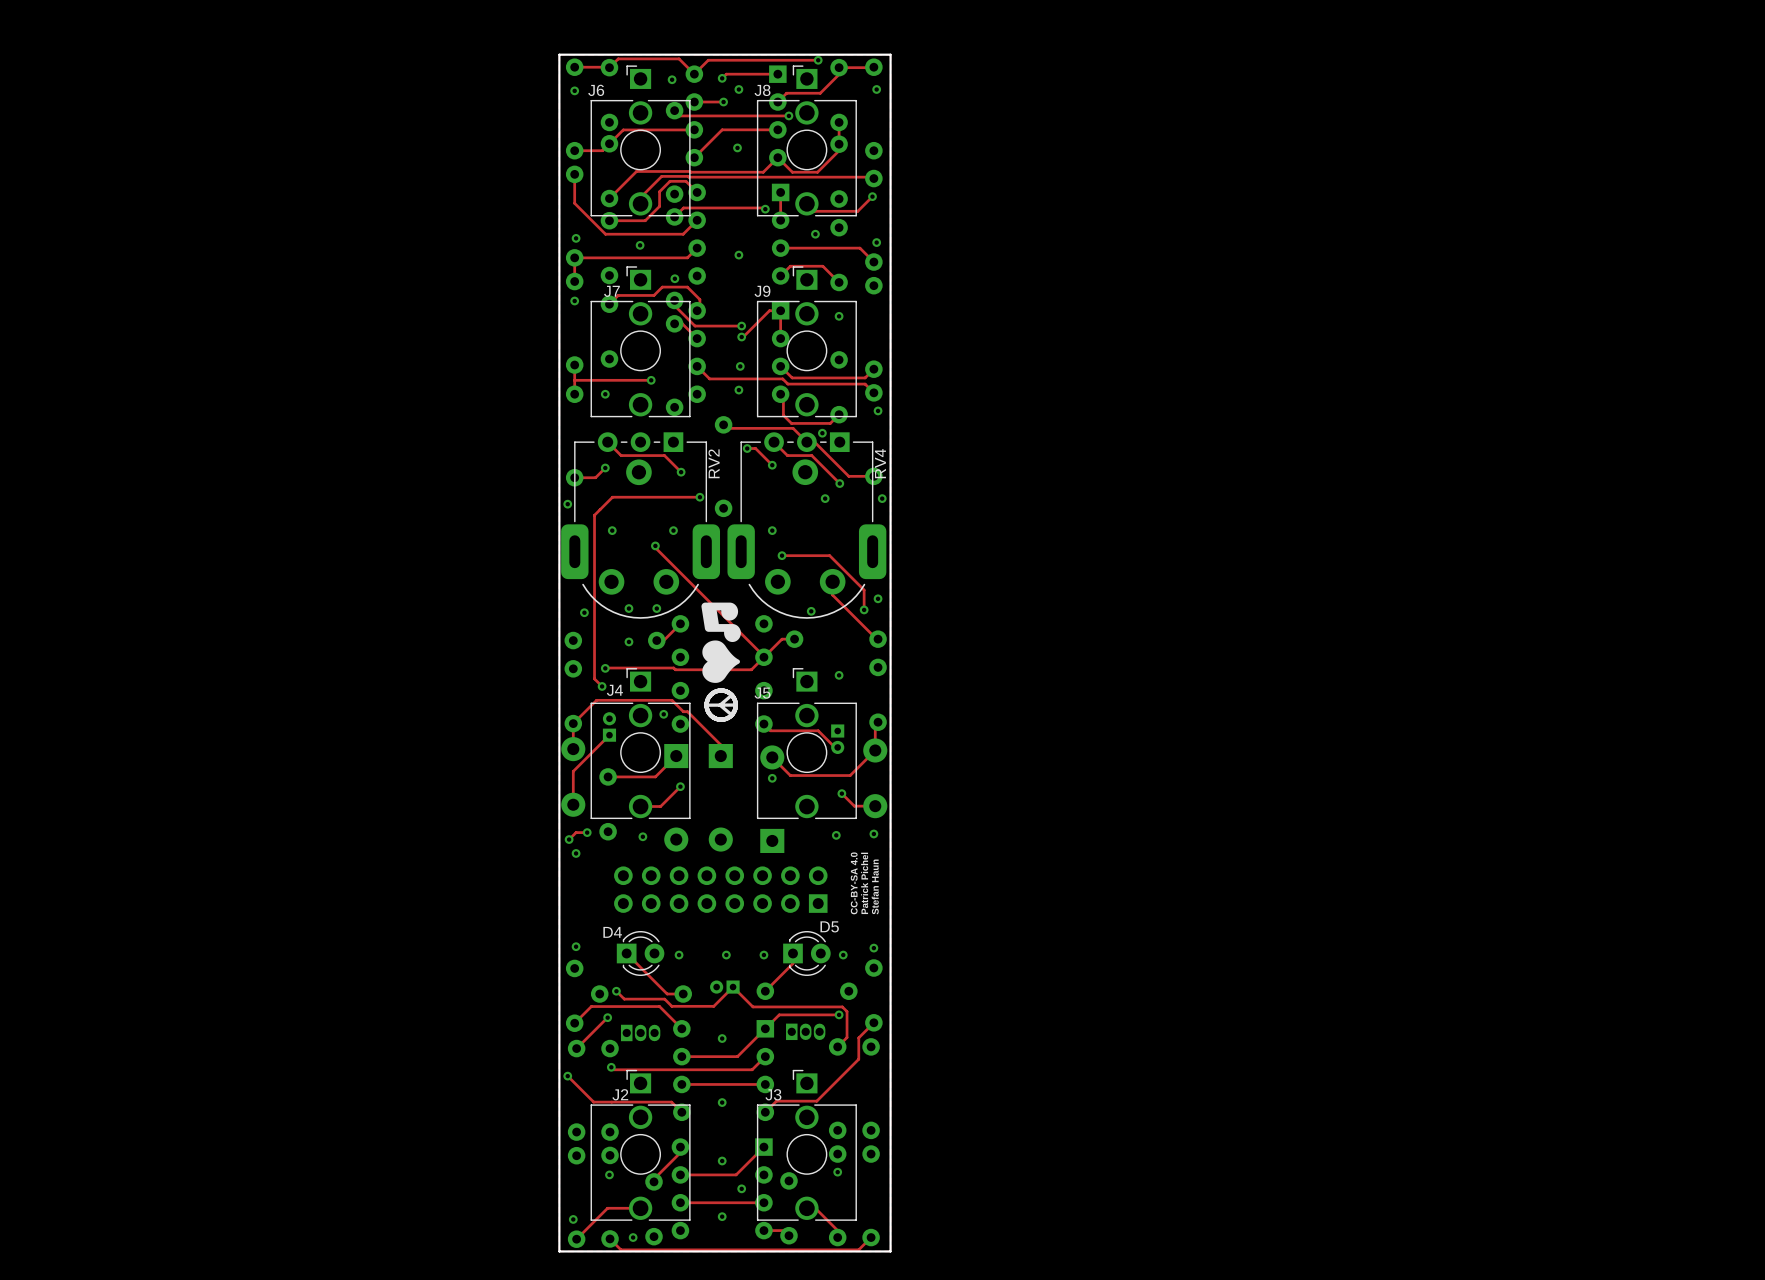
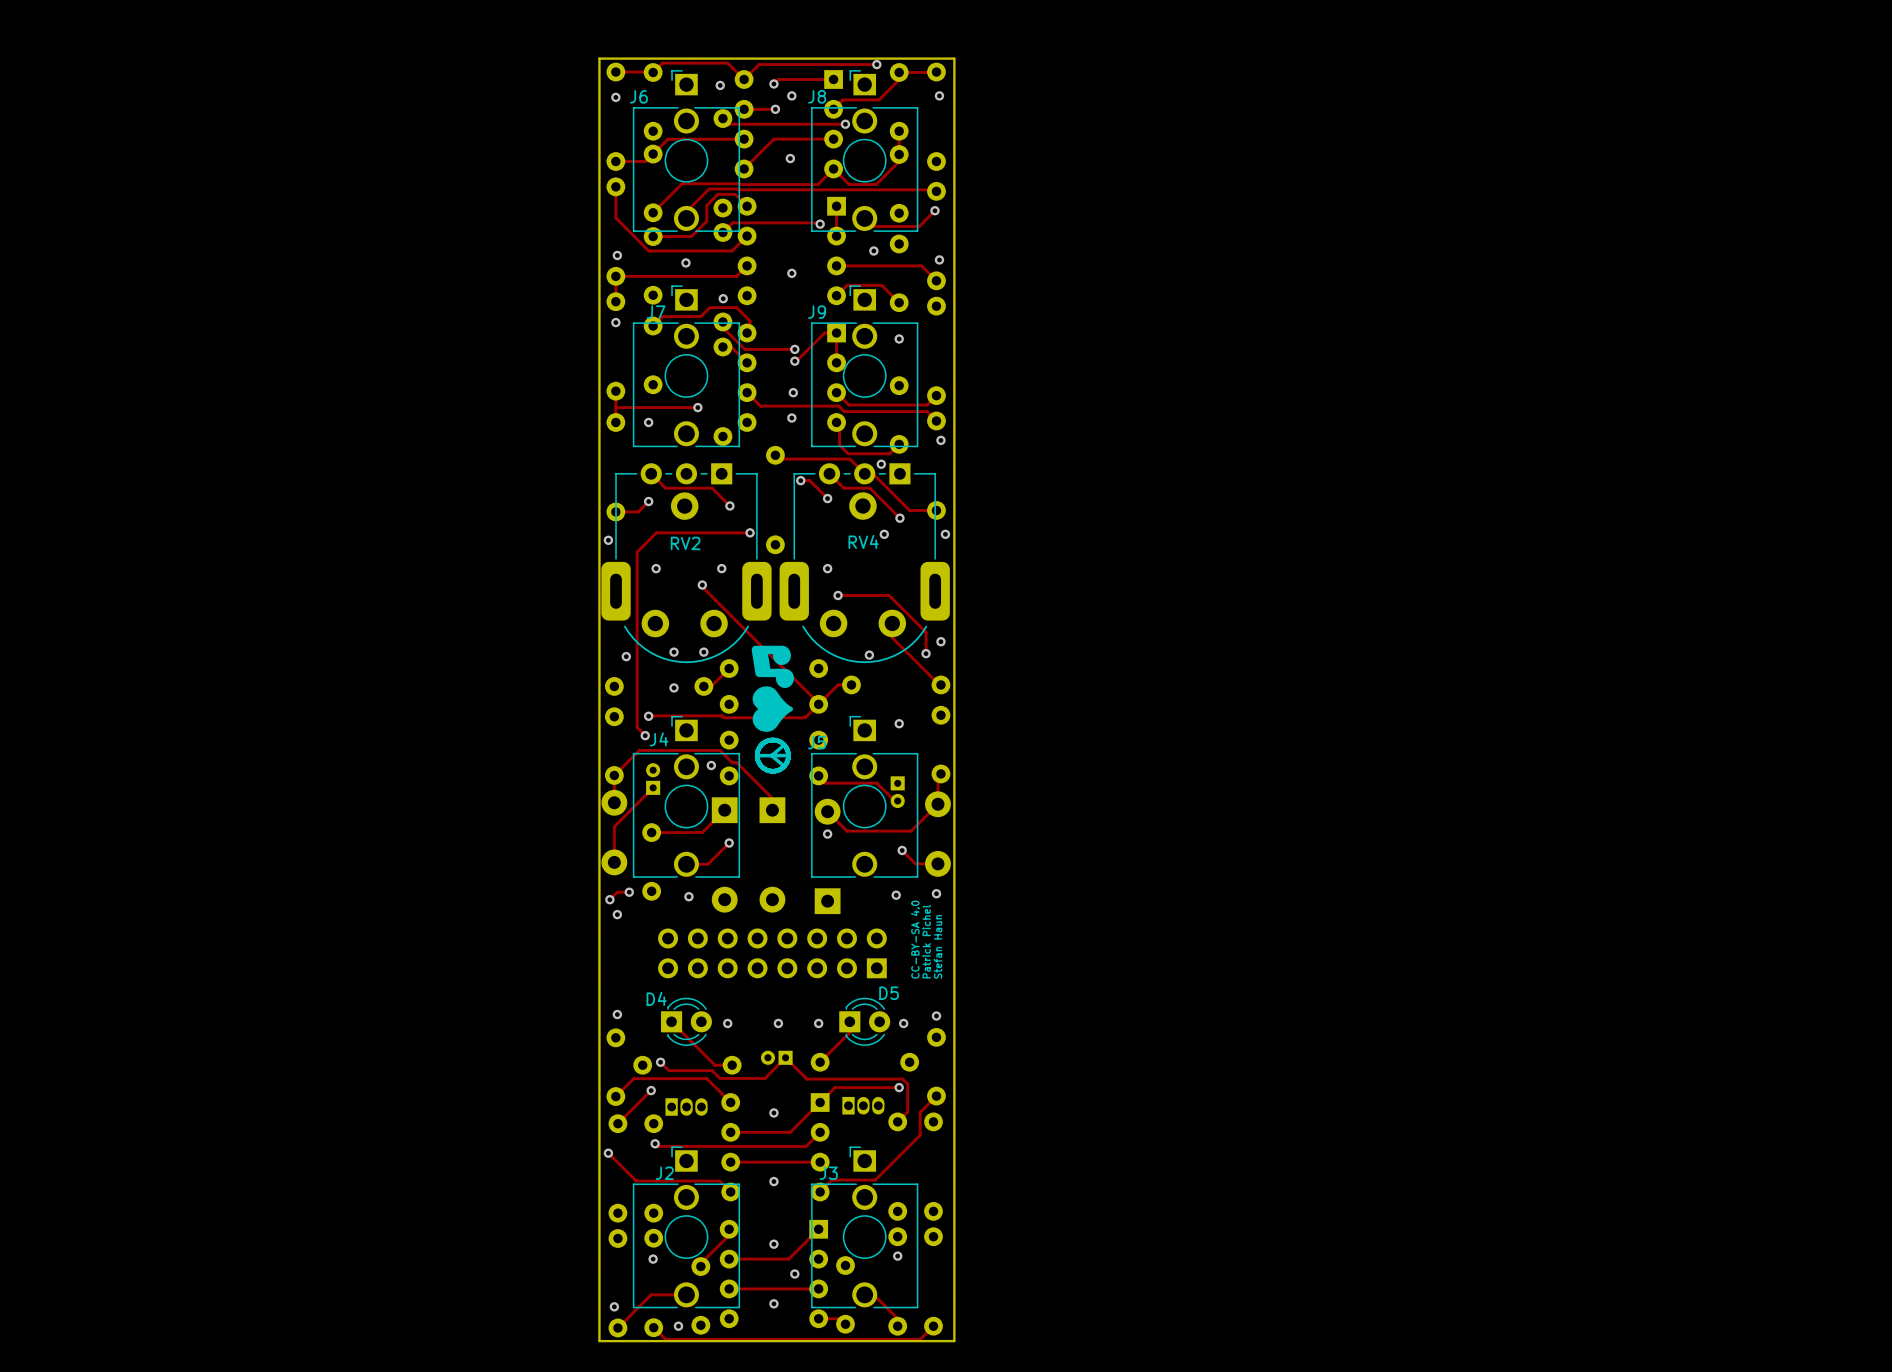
RV2 name rotation: 0° (714, 463) -> 90° clockwise (685, 543)
RV2 name position: RV2 (714, 463) -> RV2 (685, 543)
RV4 name rotation: 0° (880, 463) -> 90° clockwise (863, 541)
RV4 name position: RV4 (880, 463) -> RV4 (863, 541)

